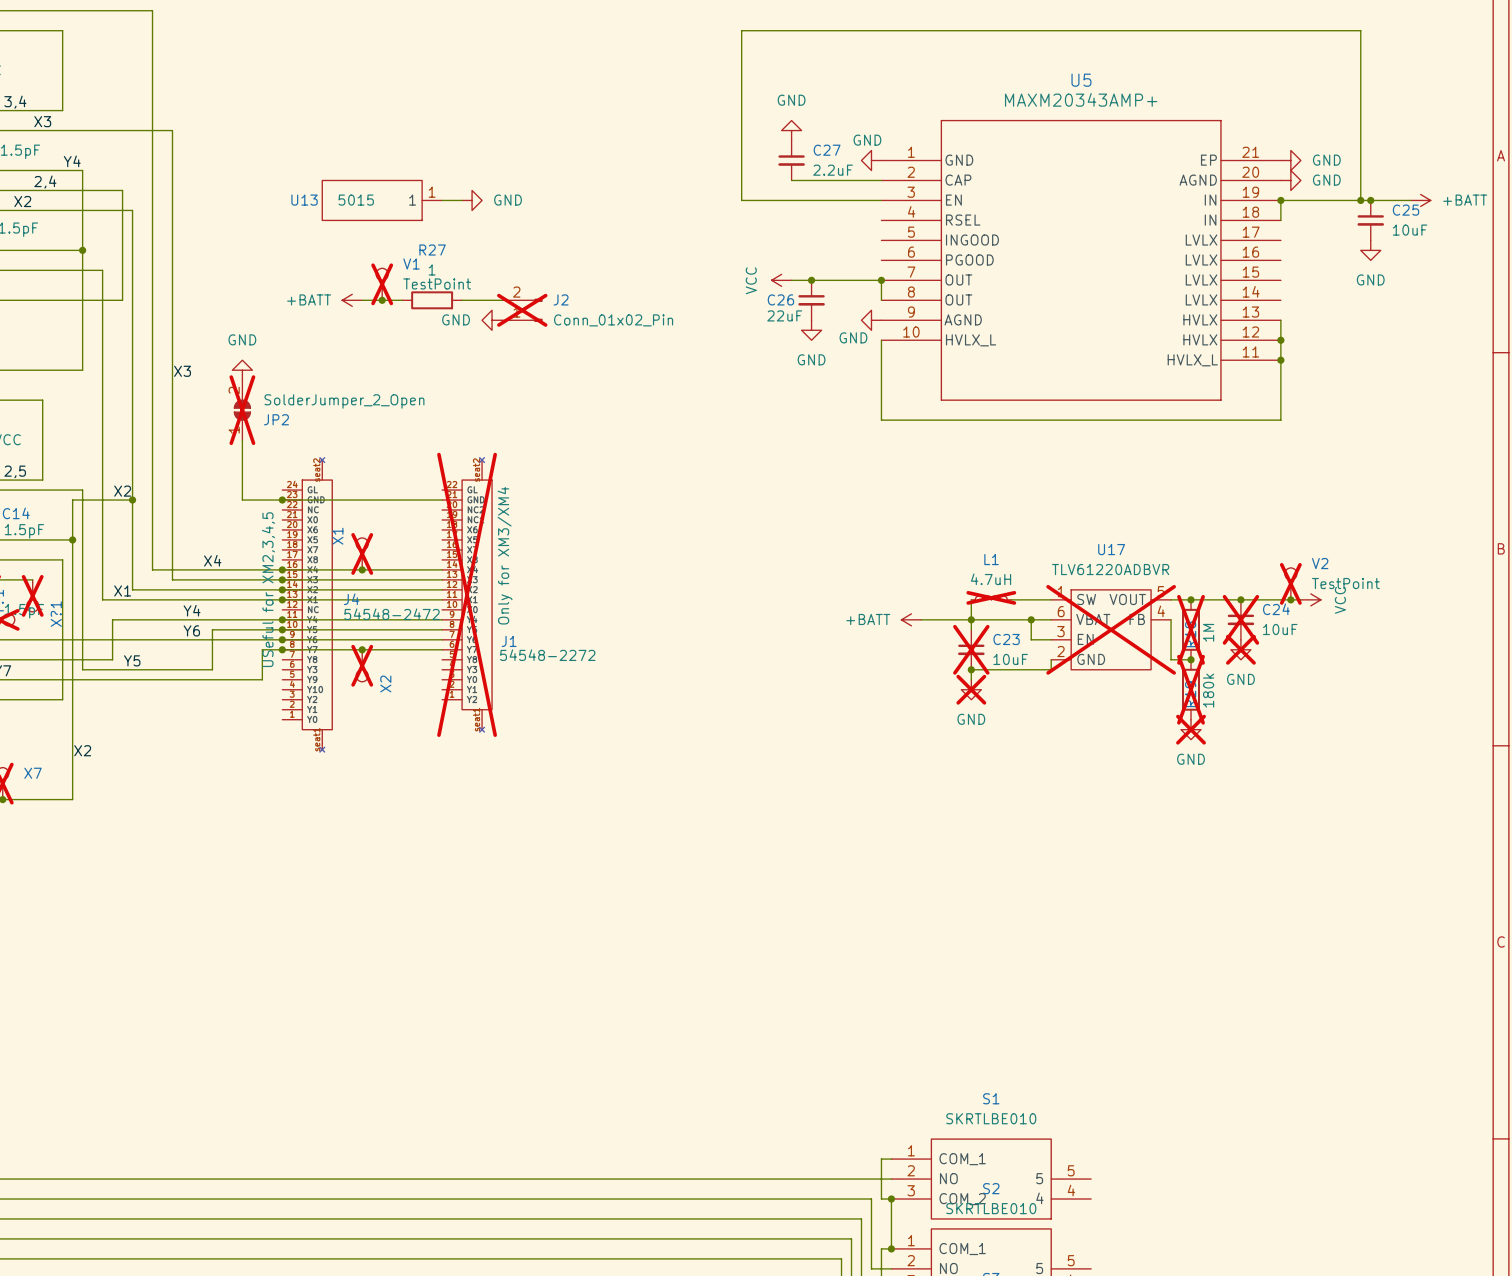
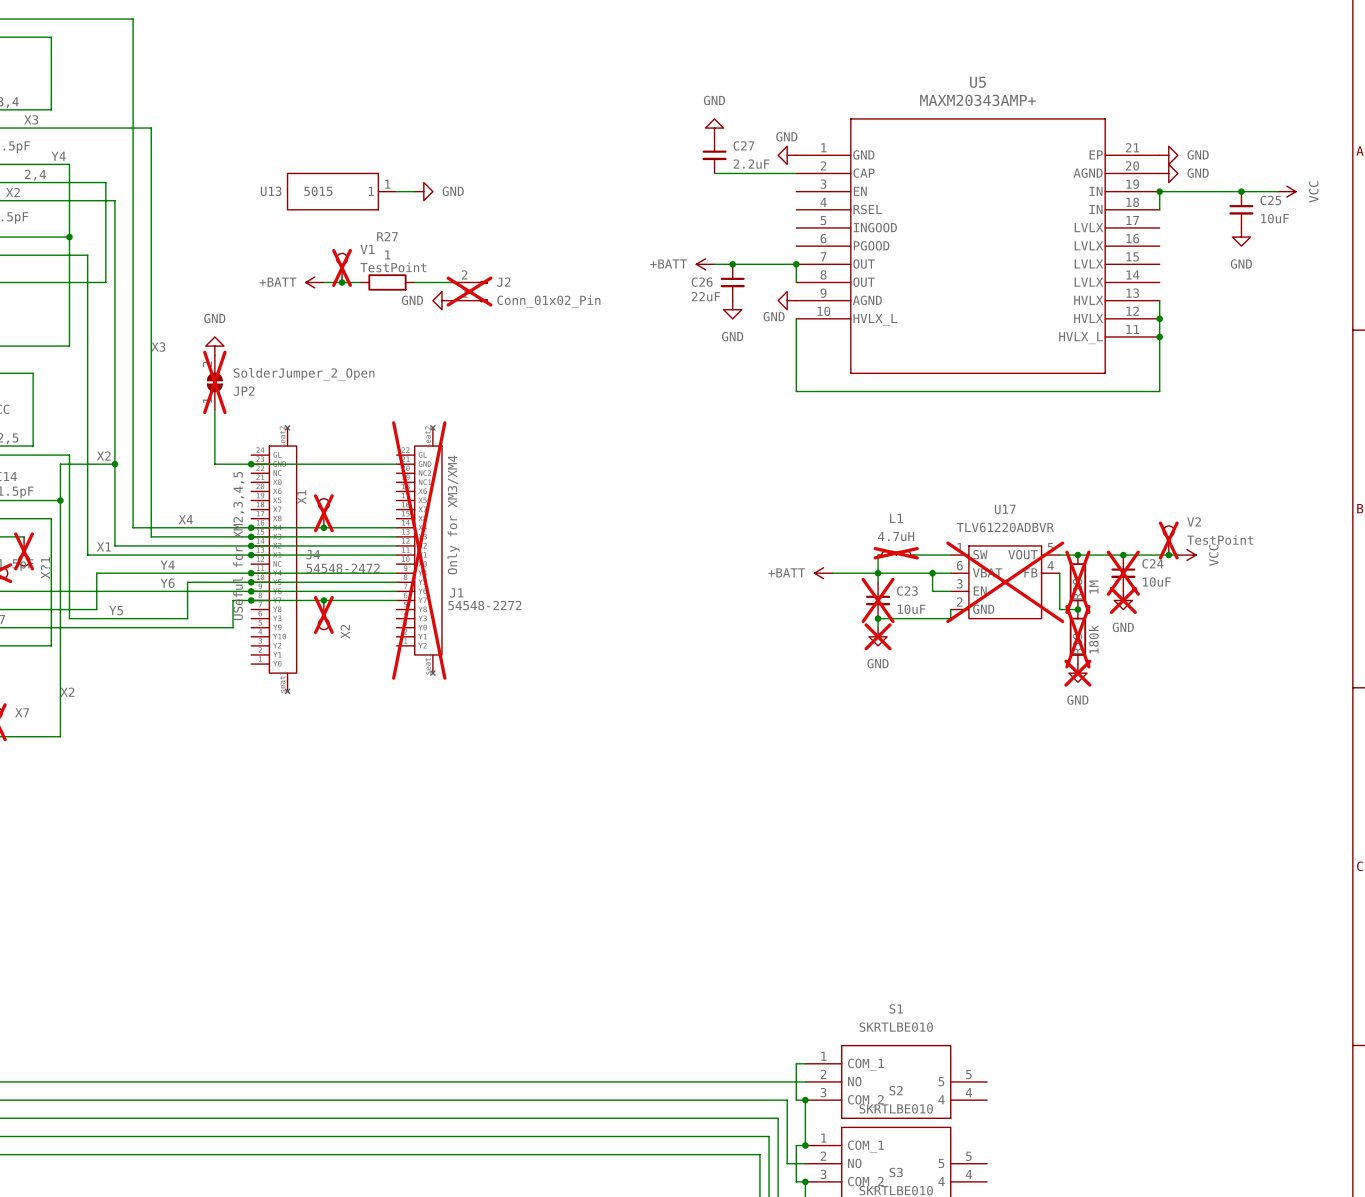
wire: (881, 200) (741, 200) (741, 30) (1360, 30) (1360, 200) -> none
junction: (1360, 200) -> none
power symbol: +BATT (1420, 200) -> VCC (1286, 191)
power symbol: VCC (781, 280) -> +BATT (705, 264)

